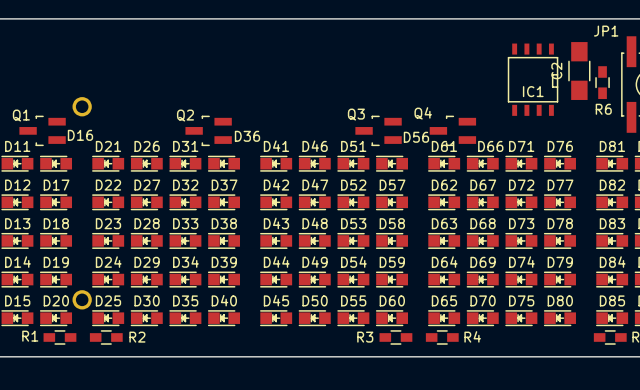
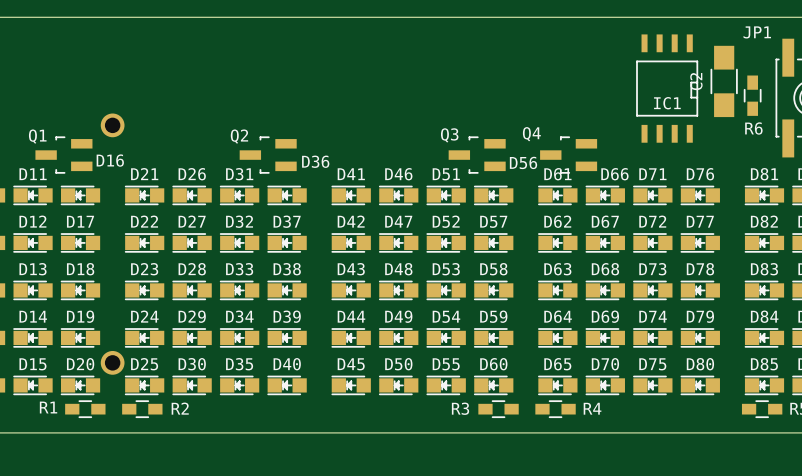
IC1 footprint: [507, 43, 559, 116] -> [636, 34, 699, 143]

